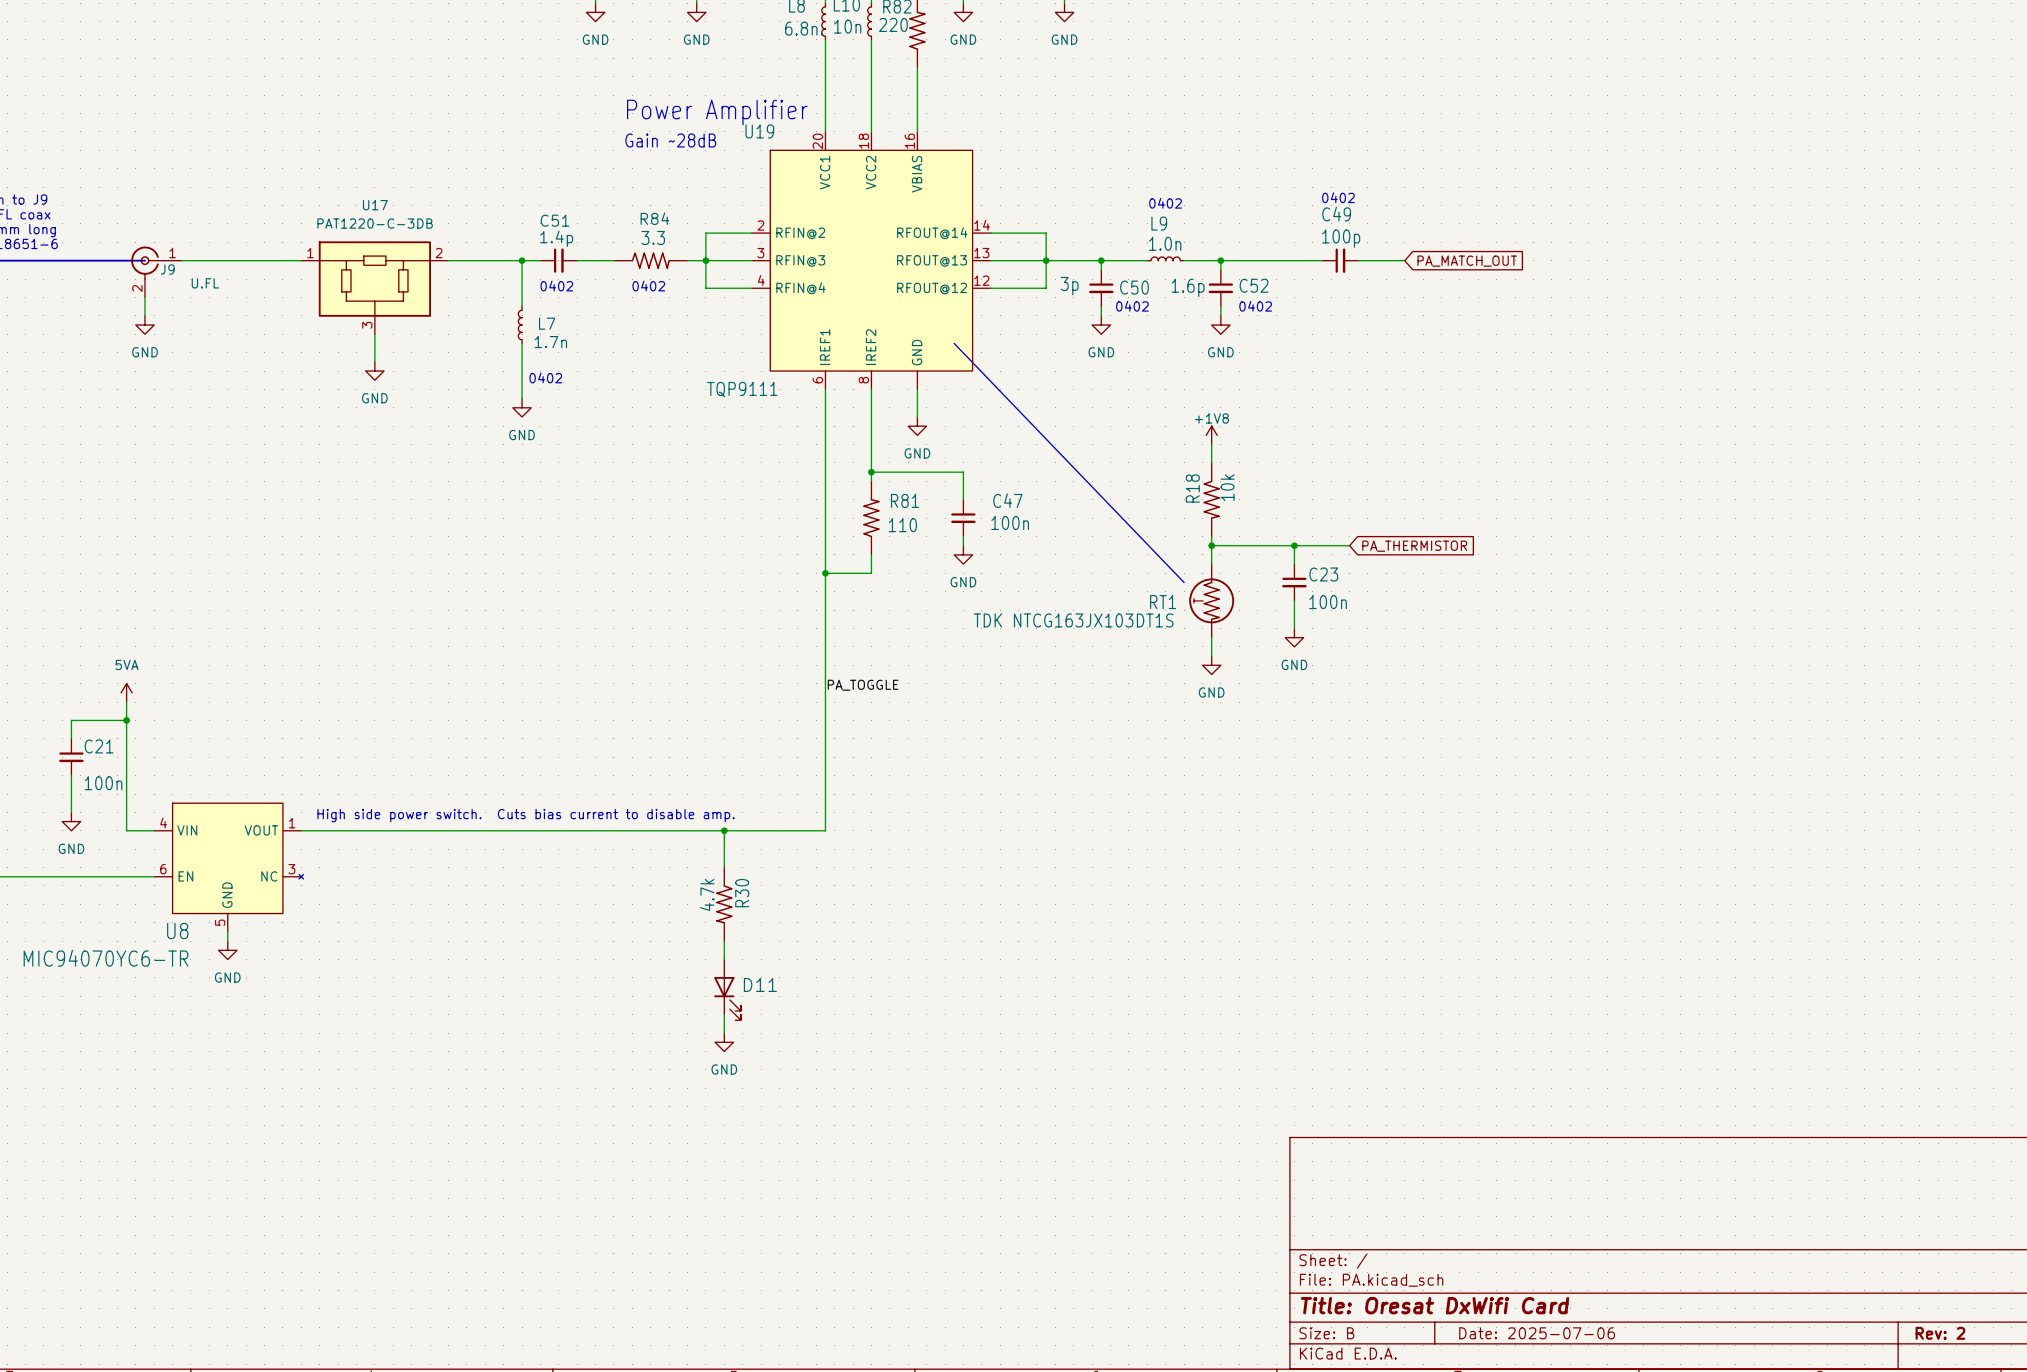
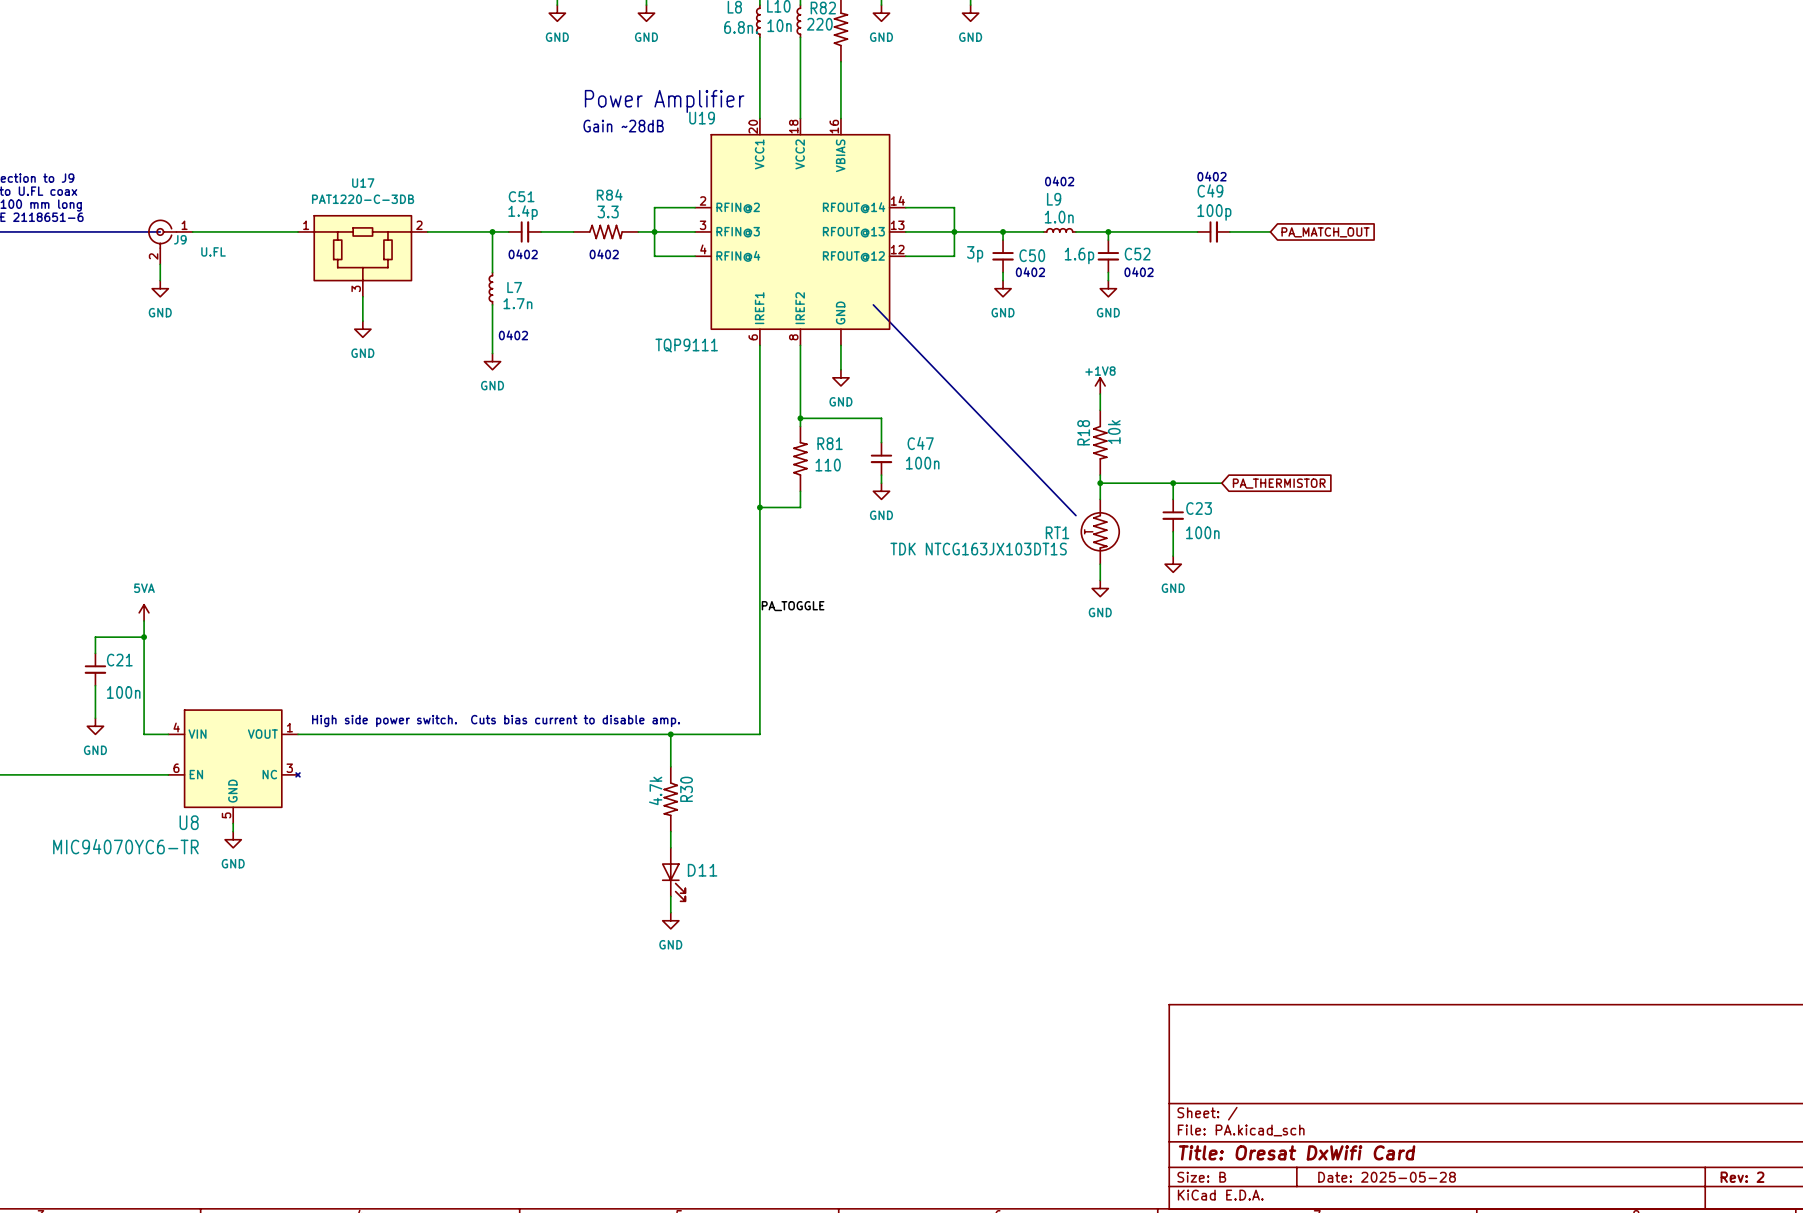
title block: Date: 2025-07-06 (1537, 1333) -> Date: 2025-05-28 (1387, 1177)

